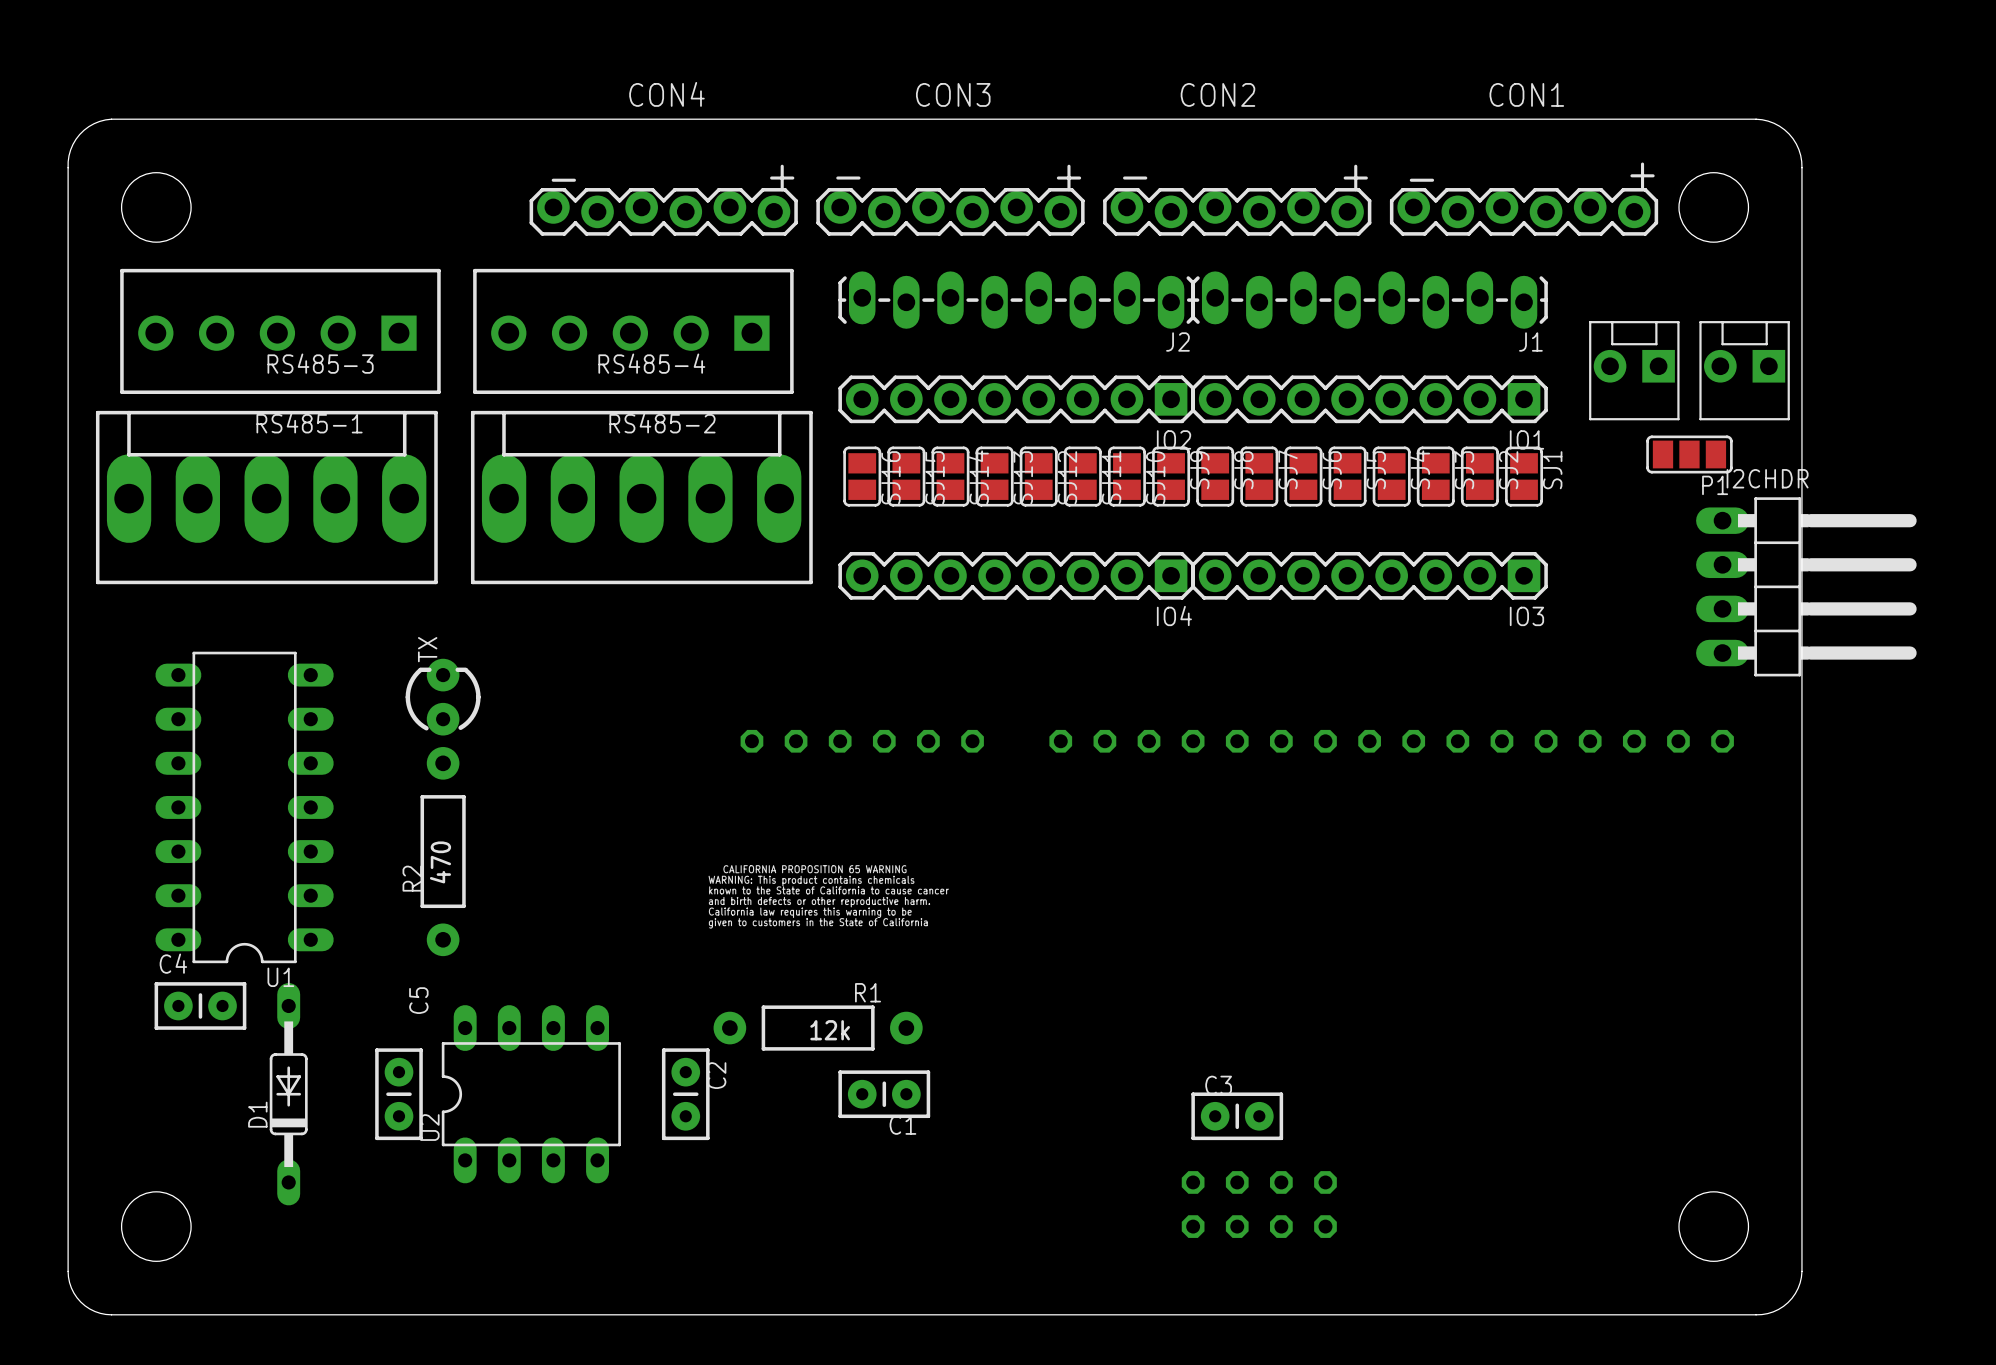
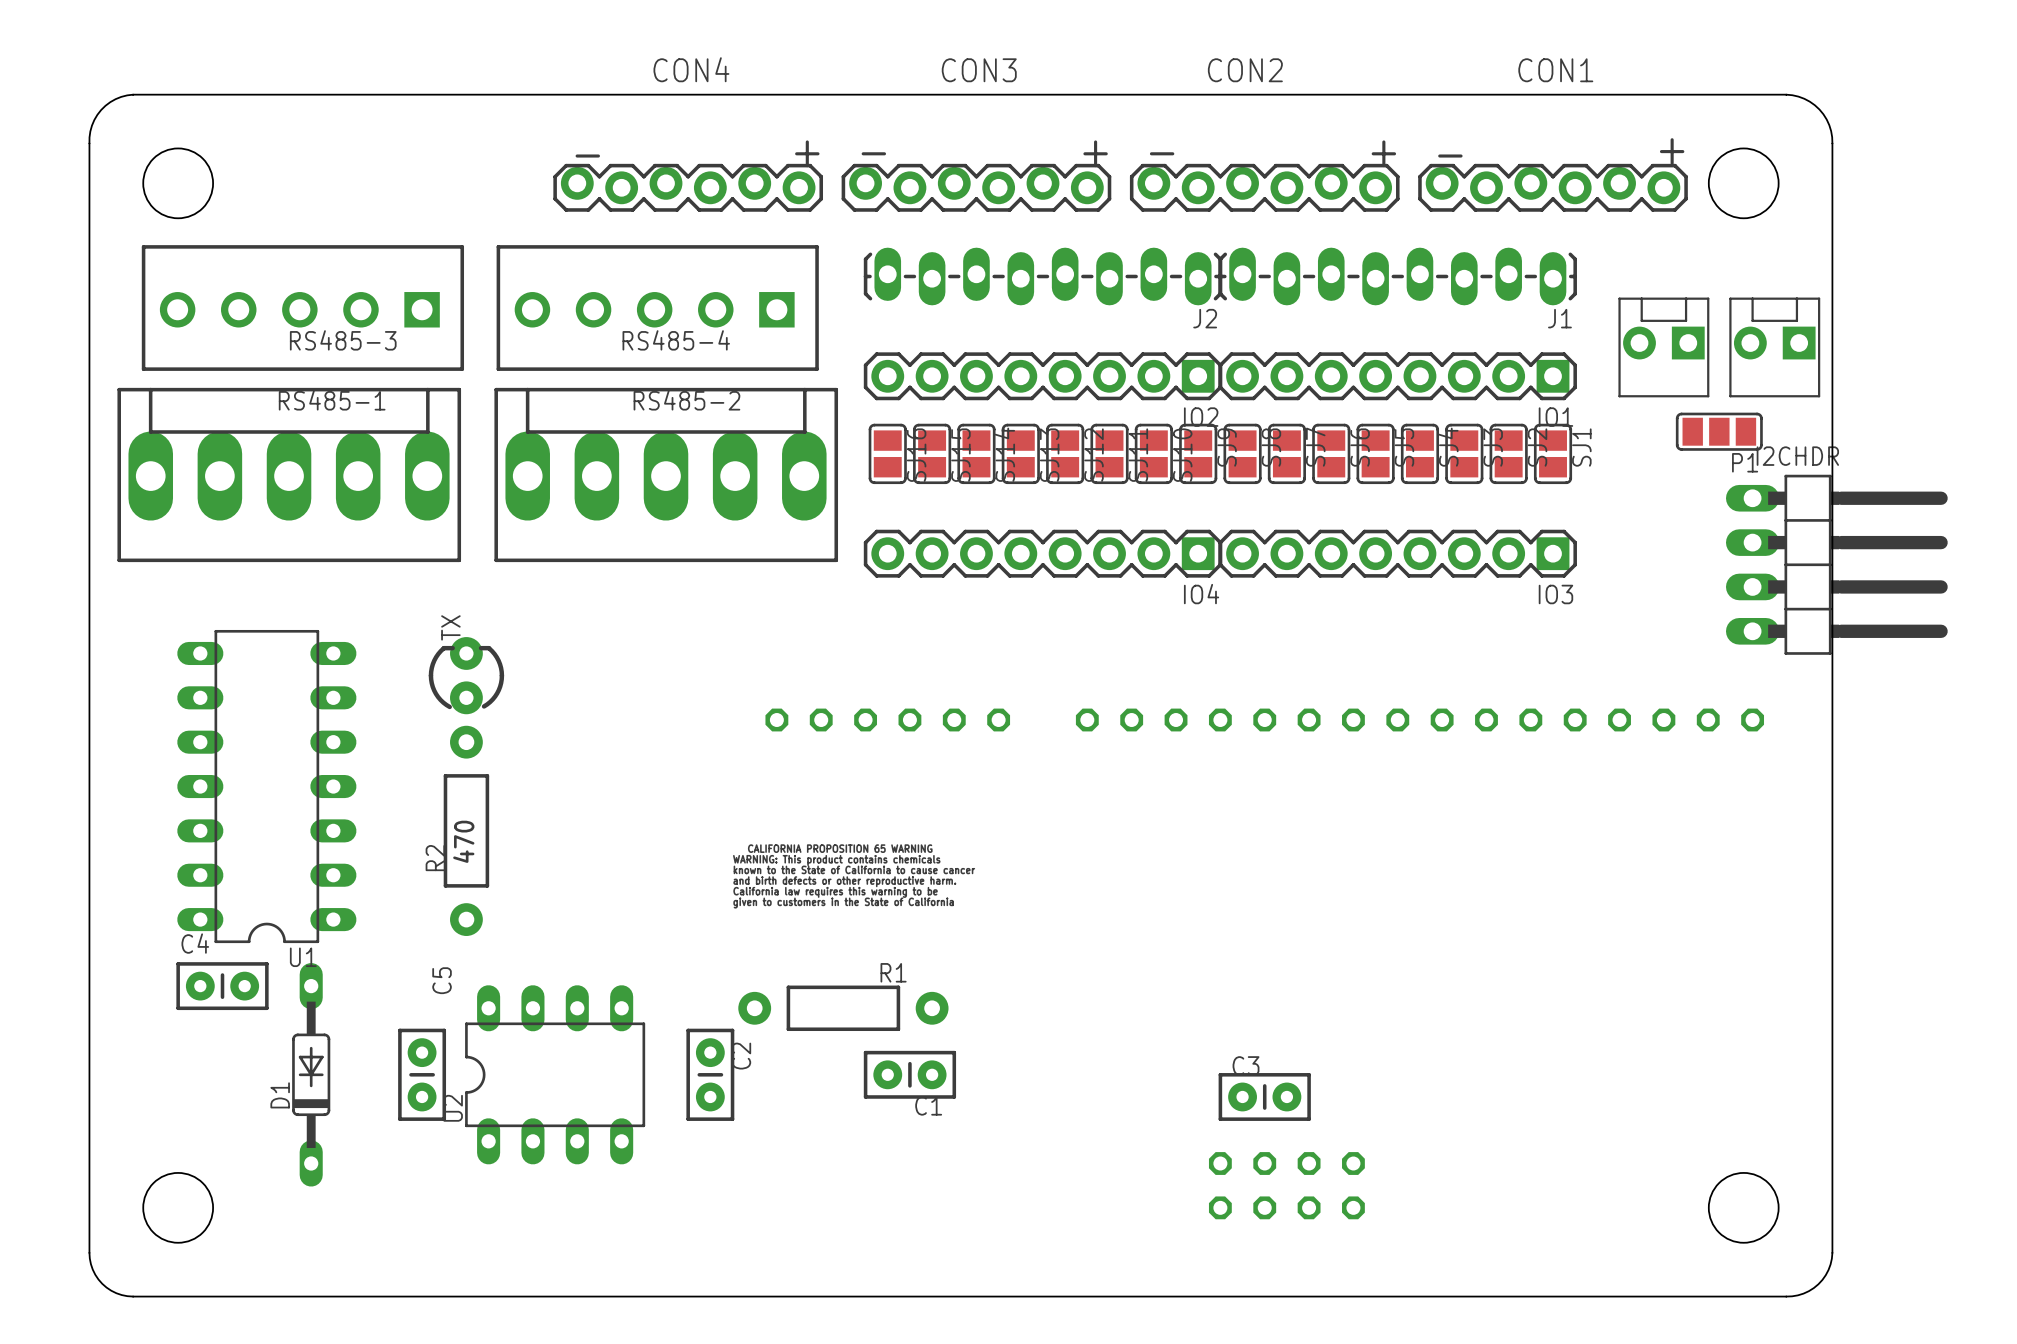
R1 value: 12k (830, 1030) -> none

